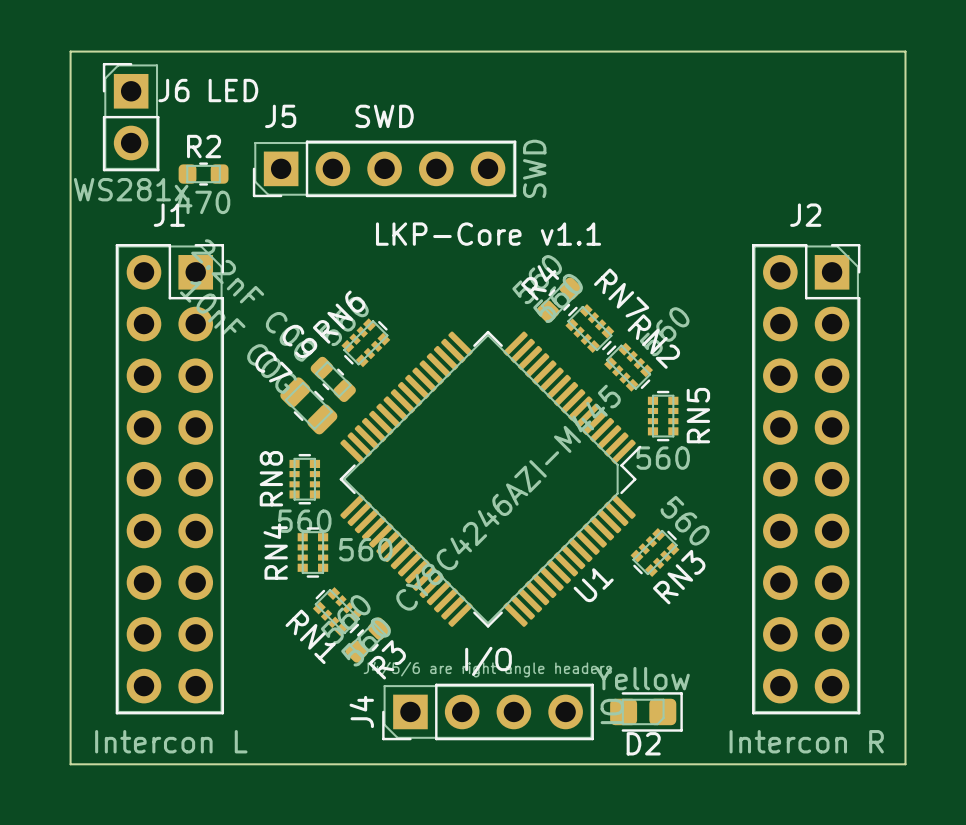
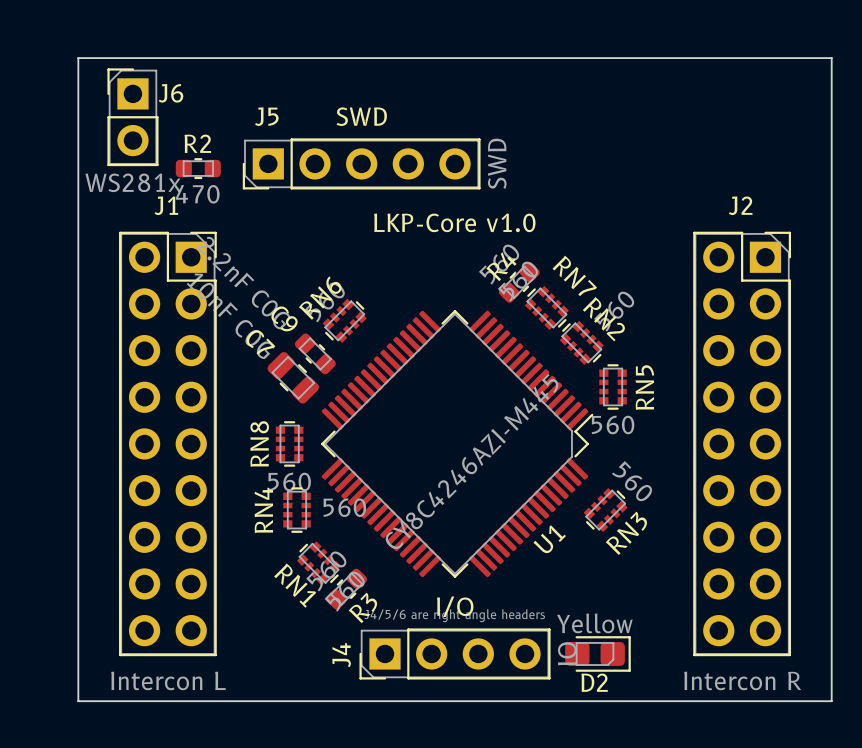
text: LED (233, 90) -> none
text: LKP-Core v1.1 (488, 234) -> LKP-Core v1.0 (454, 222)

